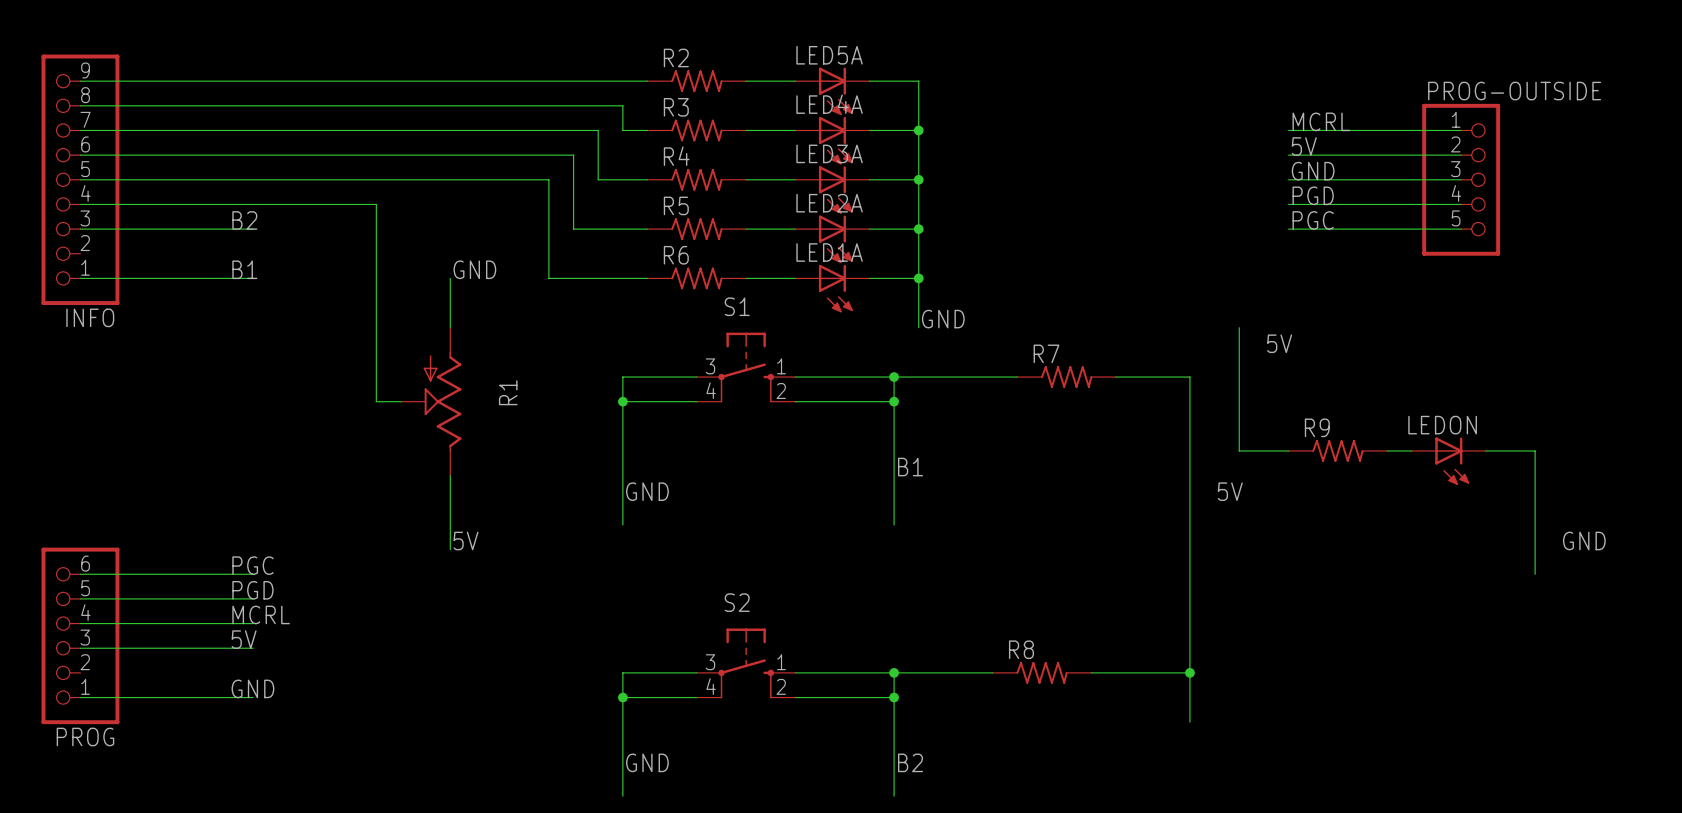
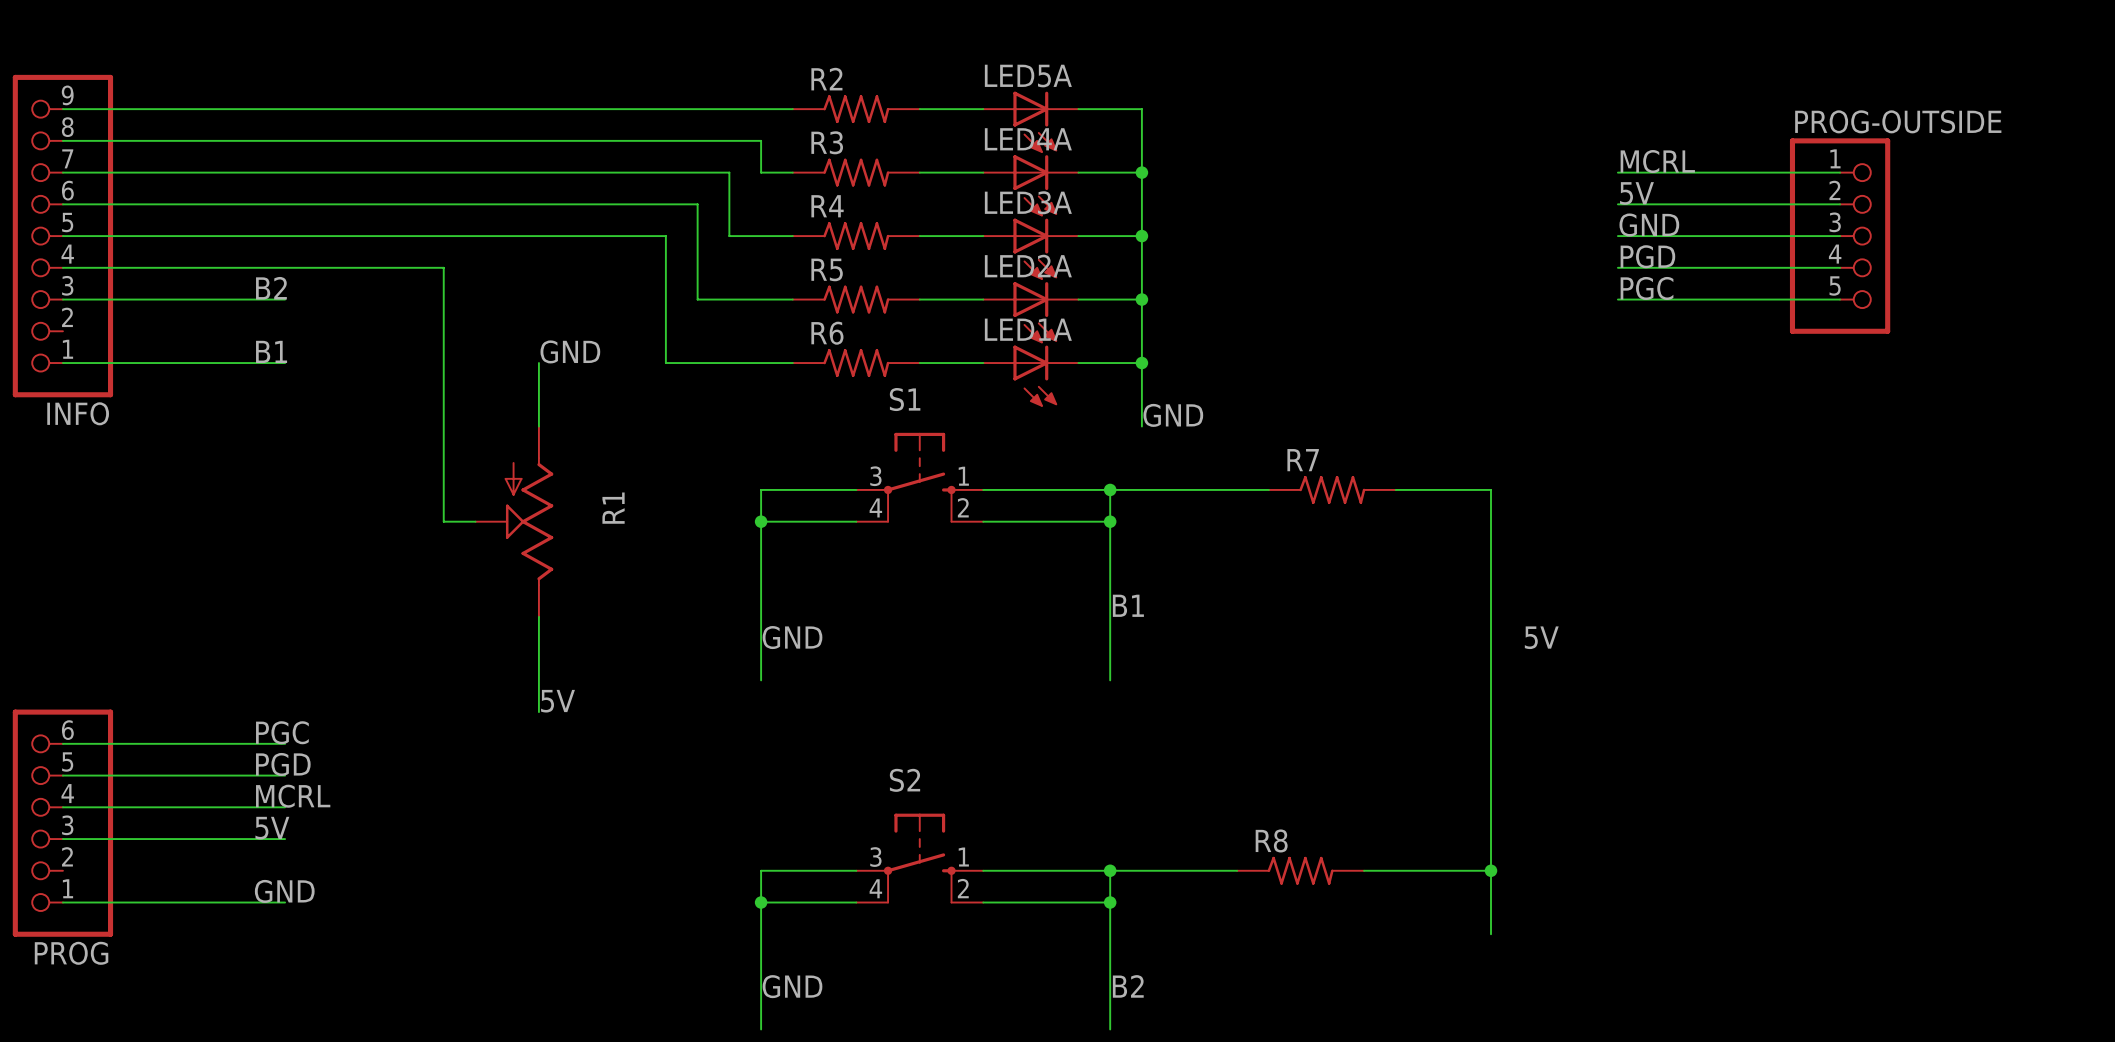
wire: (1239, 327) (1239, 450) (1288, 450) -> none
label: 5V (1279, 343) -> none
R9: (1337, 450) -> none
wire: (1387, 450) (1411, 450) -> none
wire: (1485, 450) (1535, 450) (1535, 574) -> none
LEDON: (1448, 461) -> none
label: GND (1584, 540) -> none

